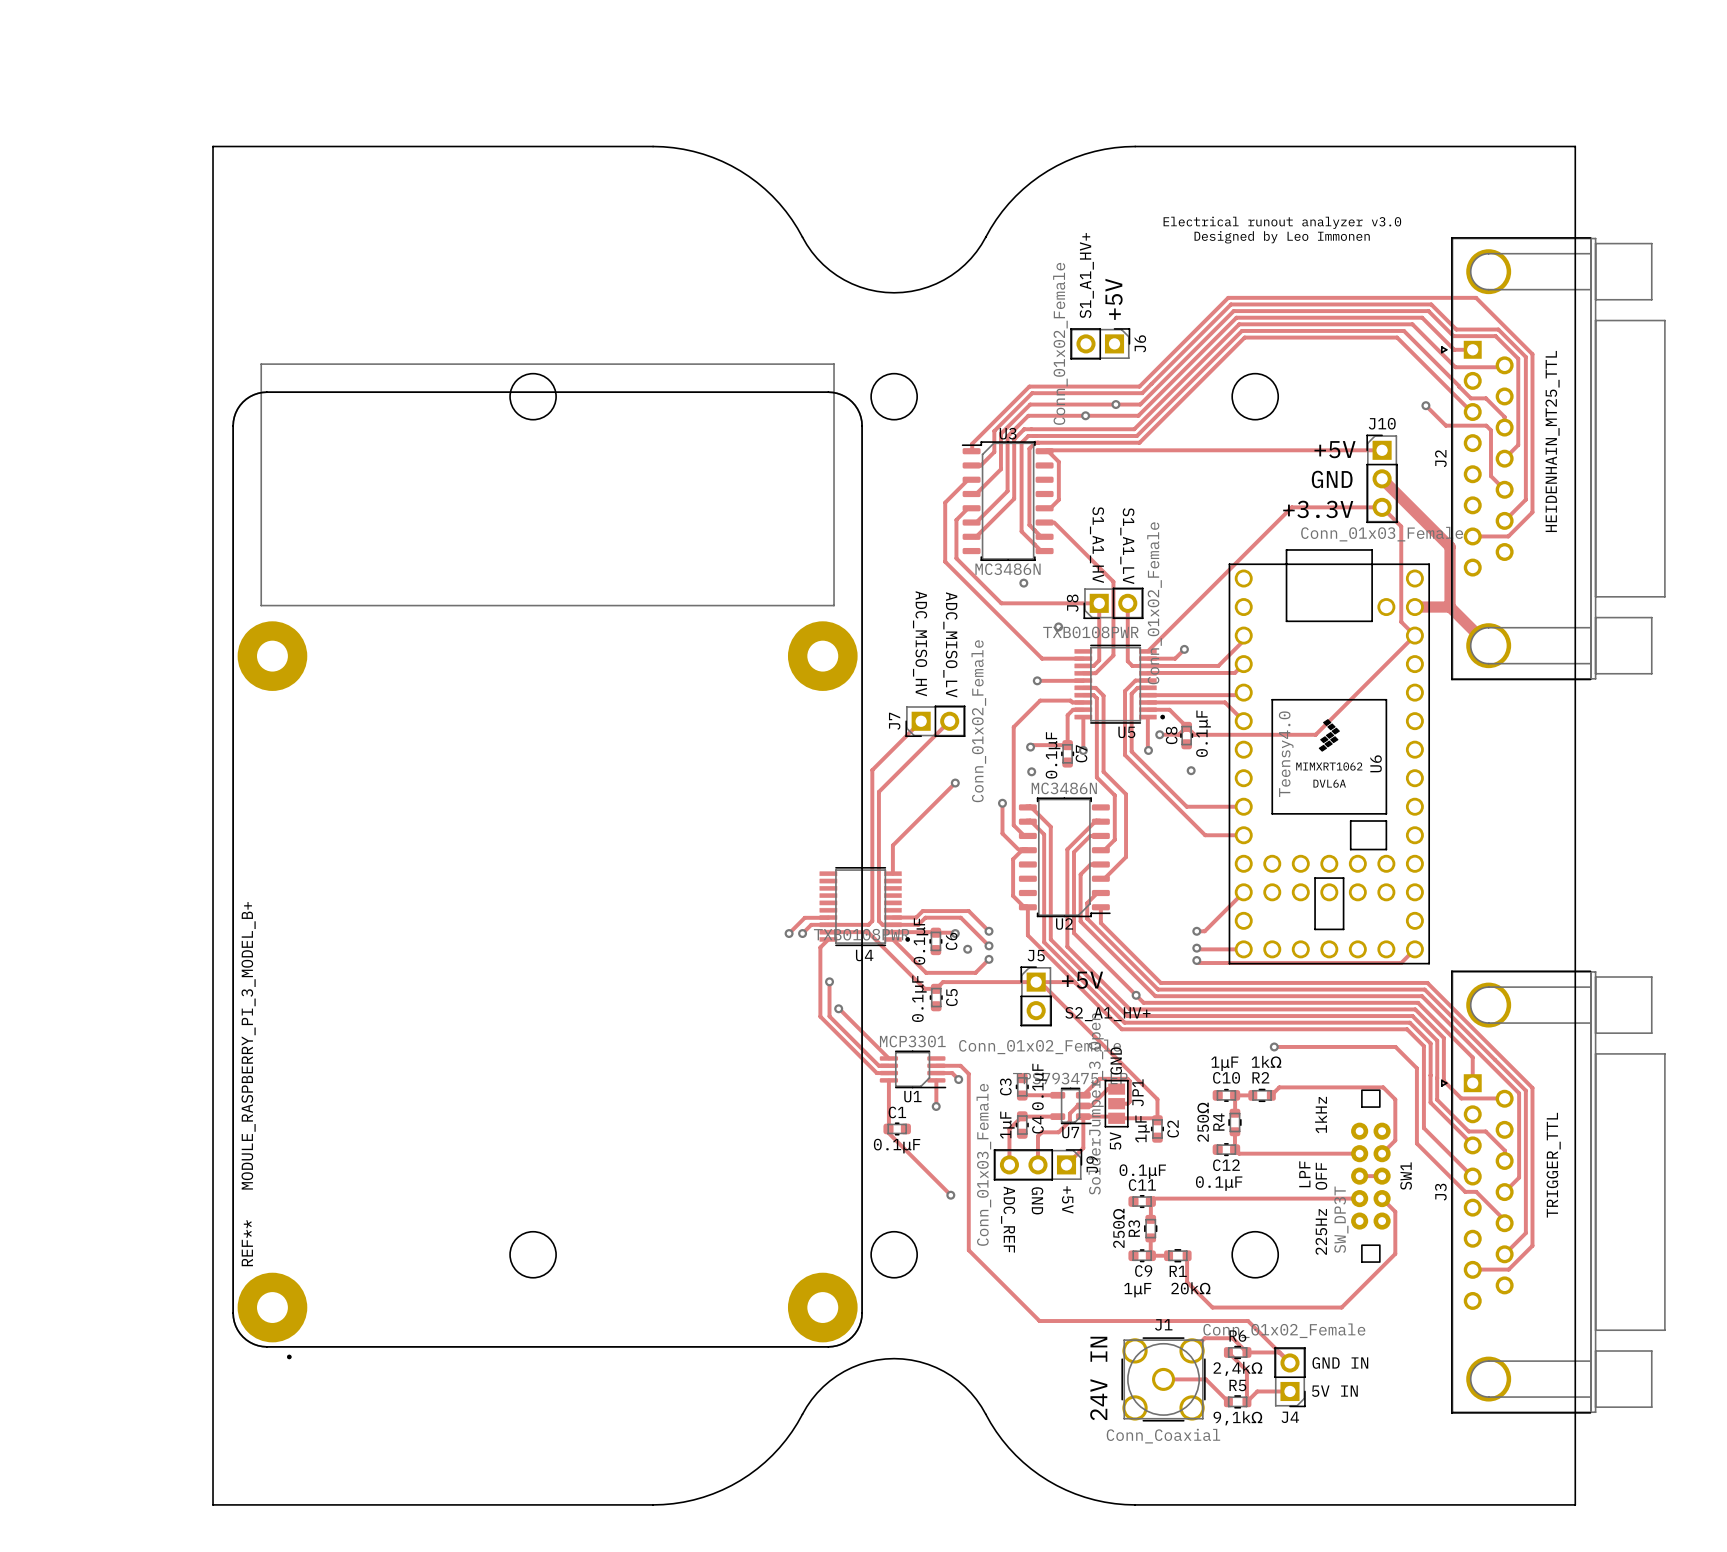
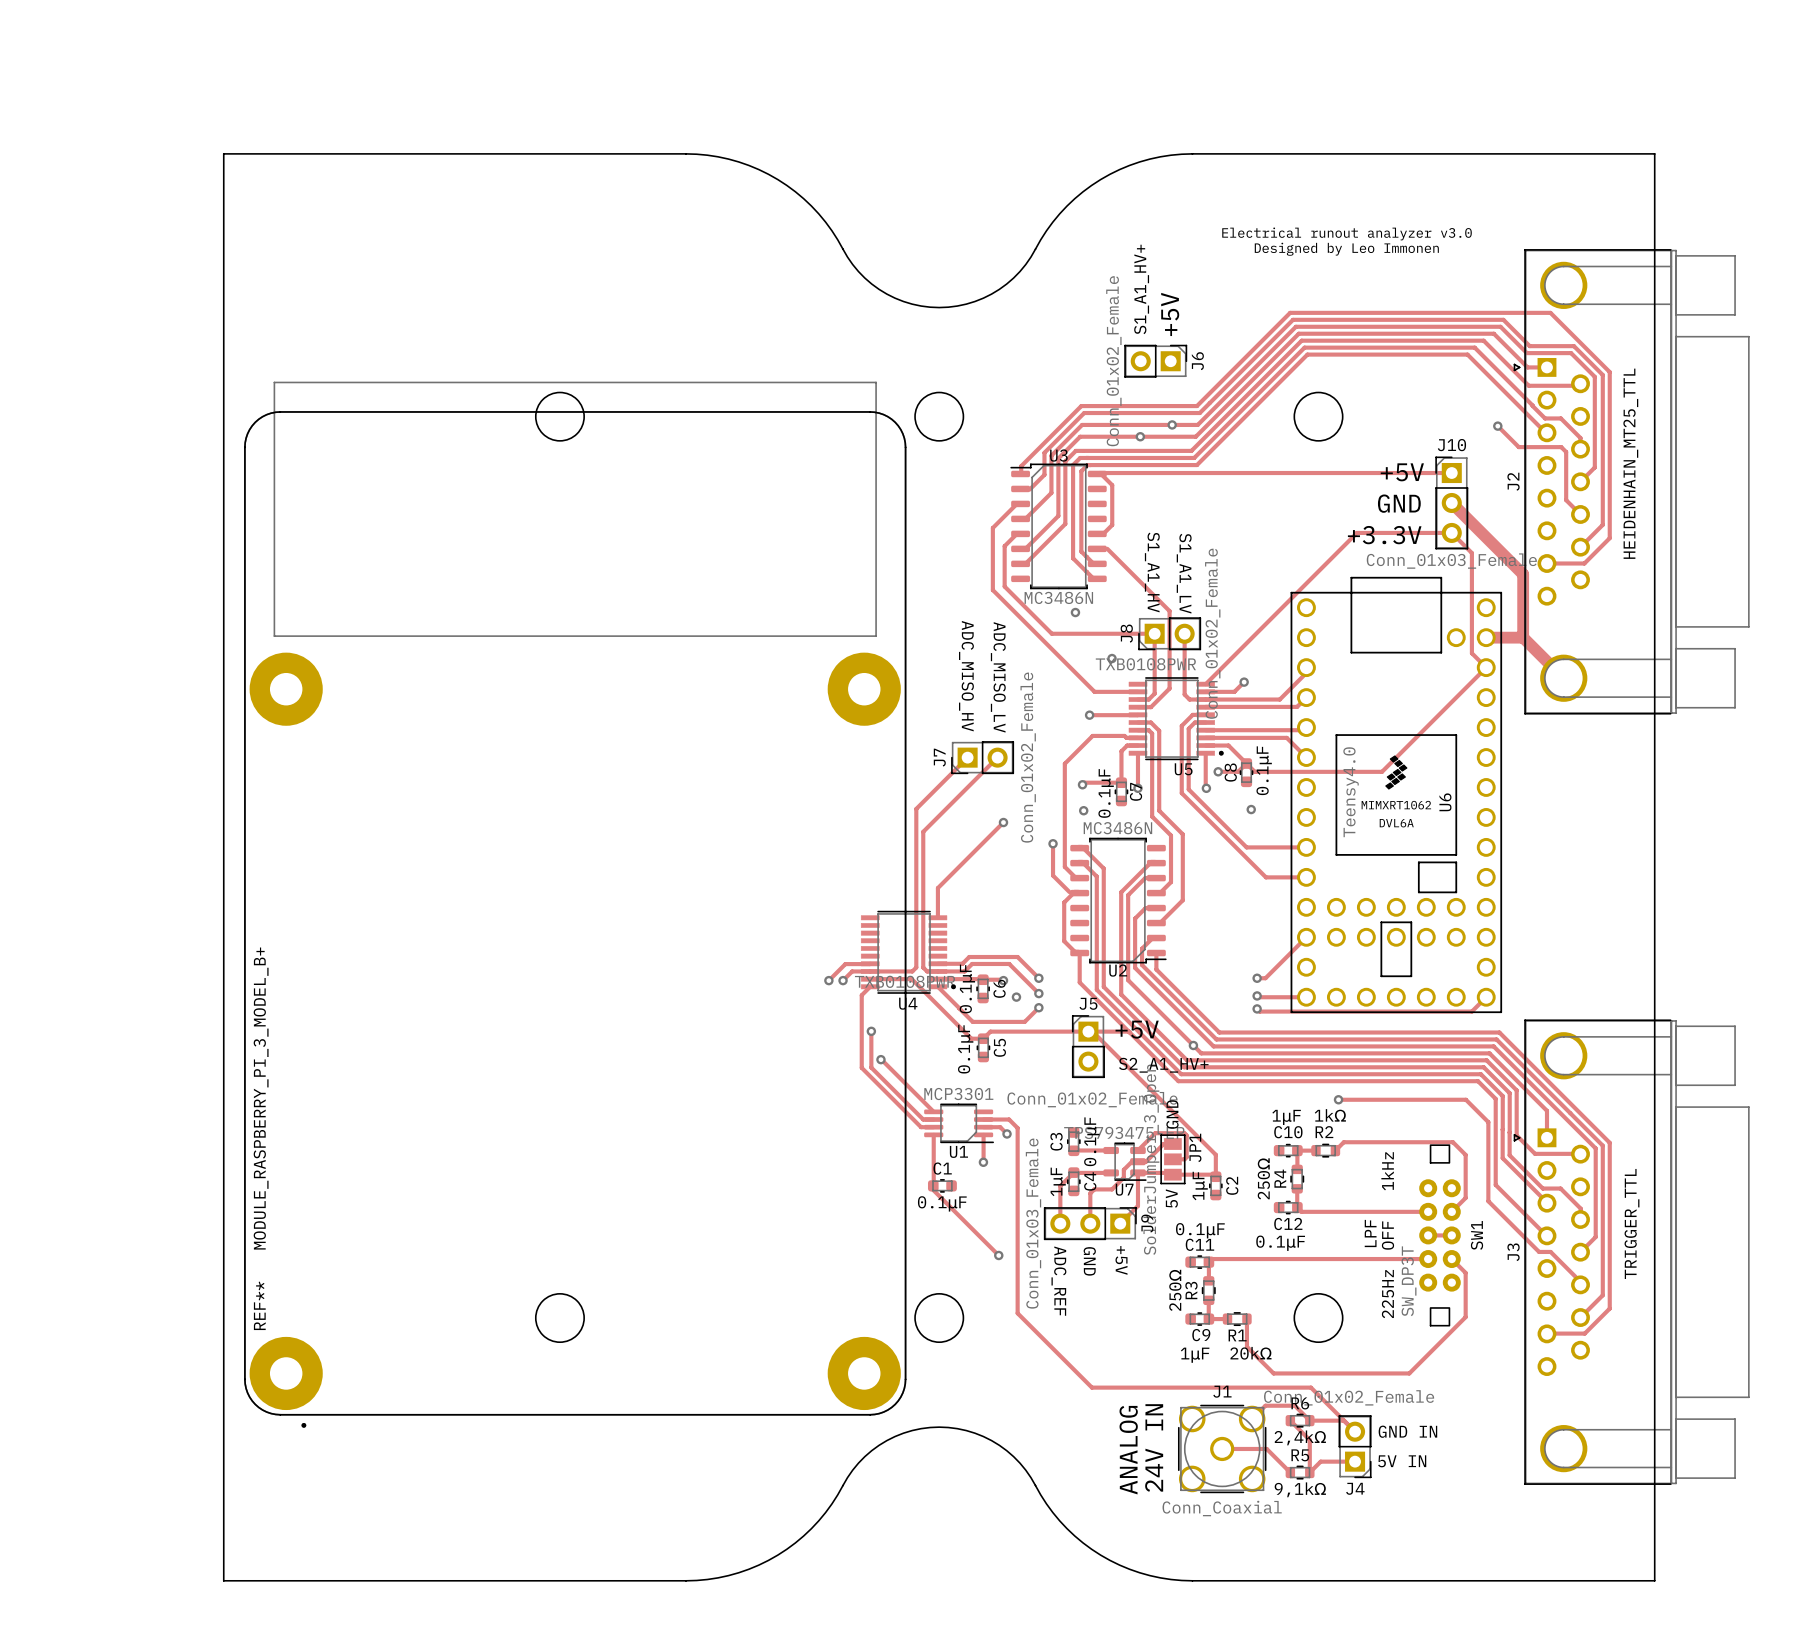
text: none -> ANALOG (1128, 1450)

